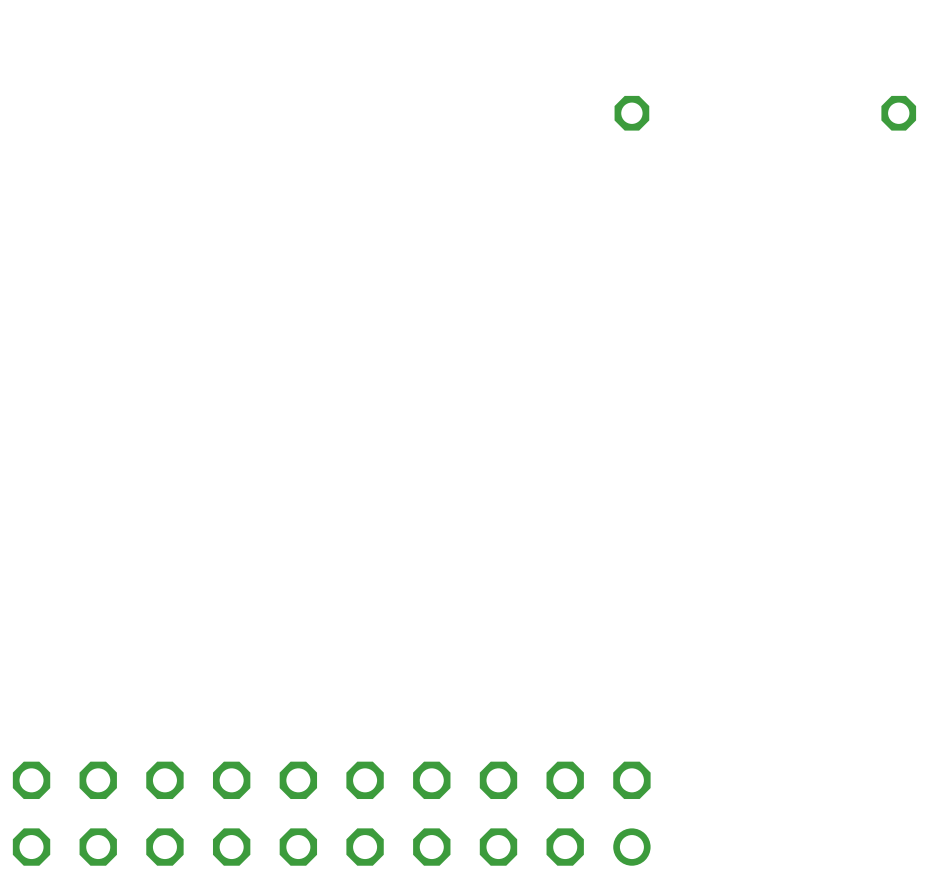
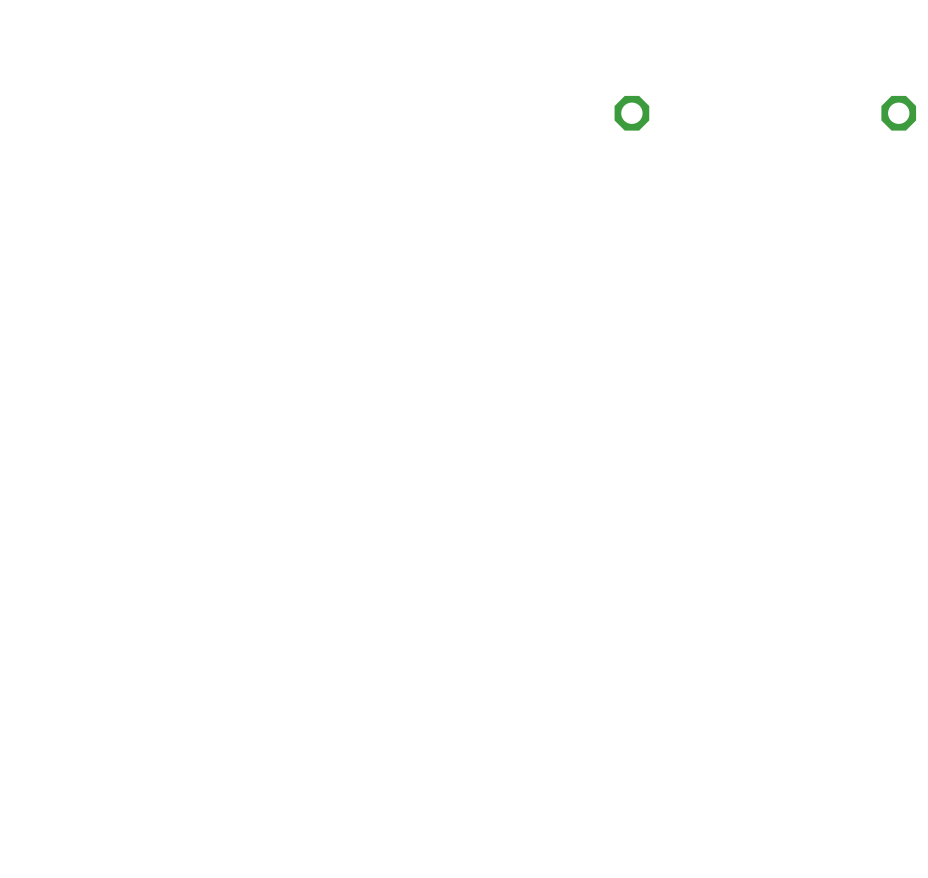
part: (331, 813) -> none

